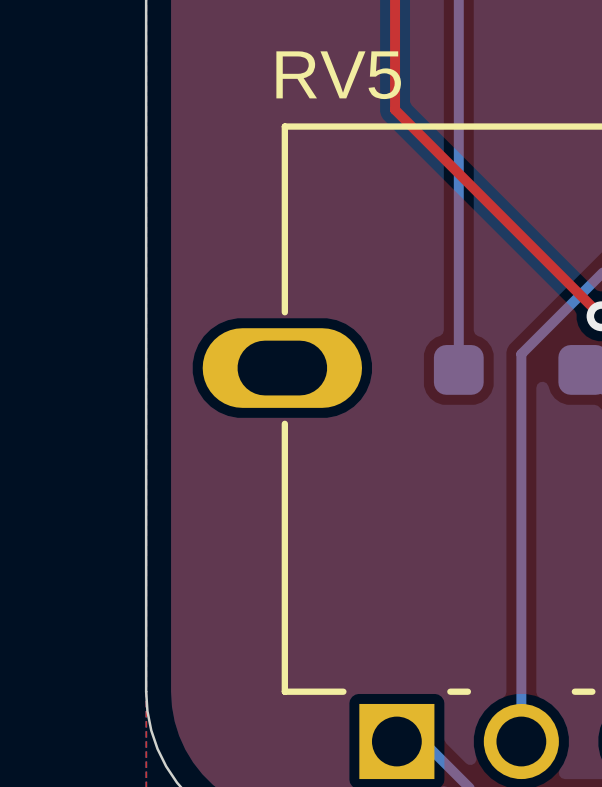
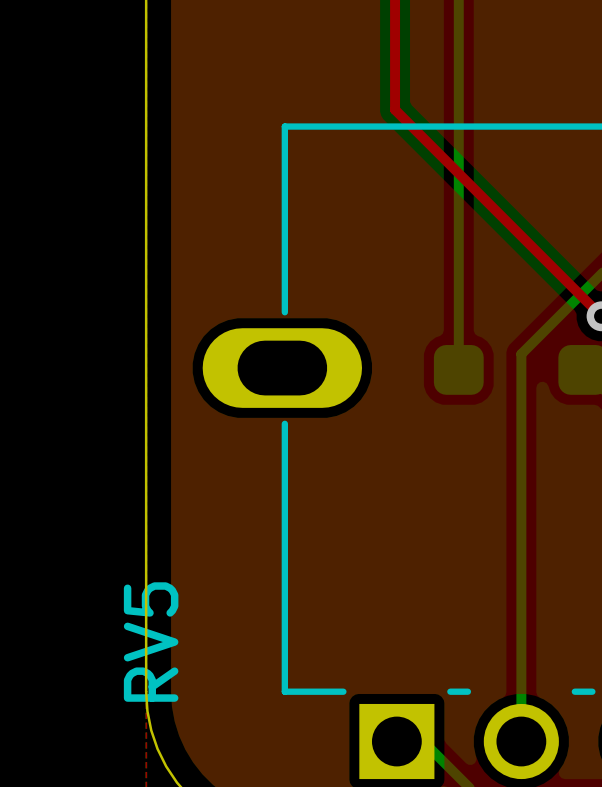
RV5 name rotation: 0° (338, 75) -> 90° counterclockwise (151, 642)
RV5 name position: RV5 (338, 75) -> RV5 (151, 642)

